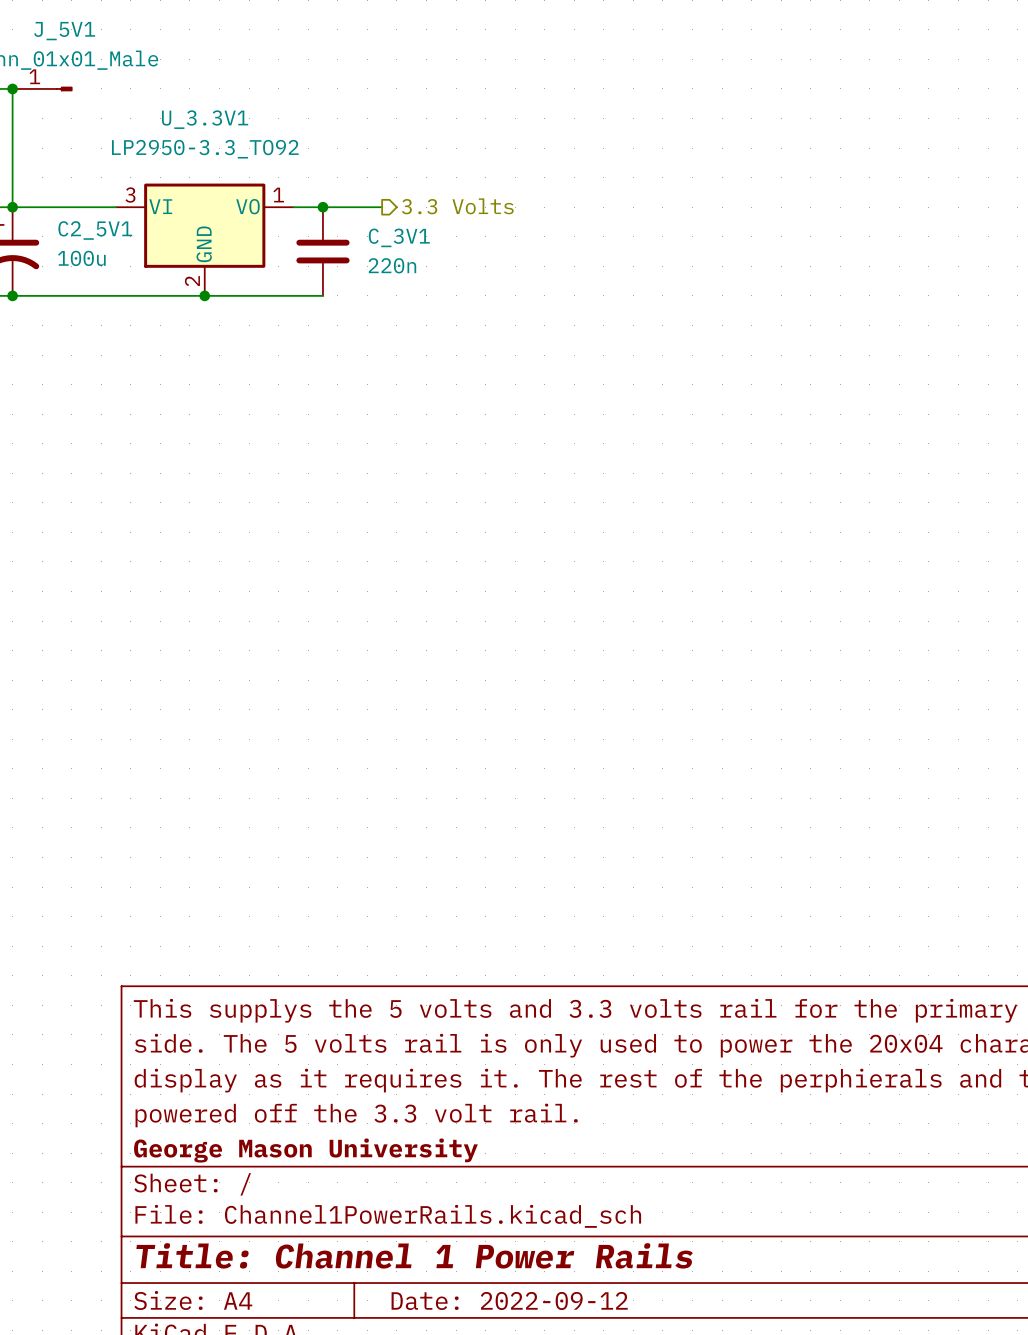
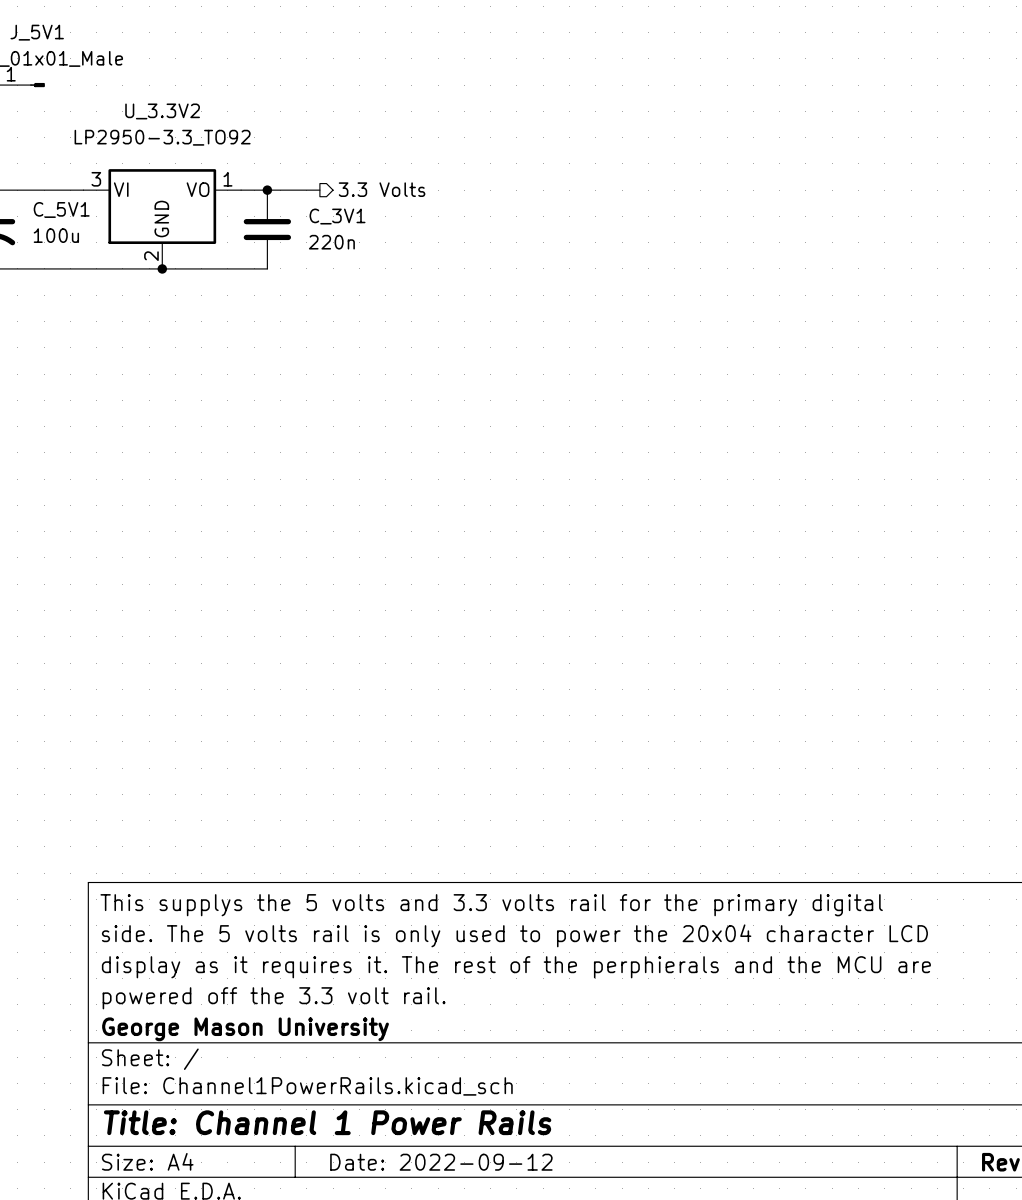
U_3.3V1 name: U_3.3V1 (205, 119) -> U_3.3V2 (162, 111)
C2_5V1 name: C2_5V1 (95, 230) -> C_5V1 (61, 209)

